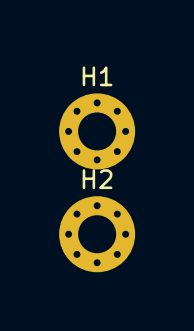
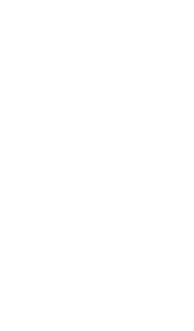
H1: (97, 131) -> none
H2: (97, 234) -> none

